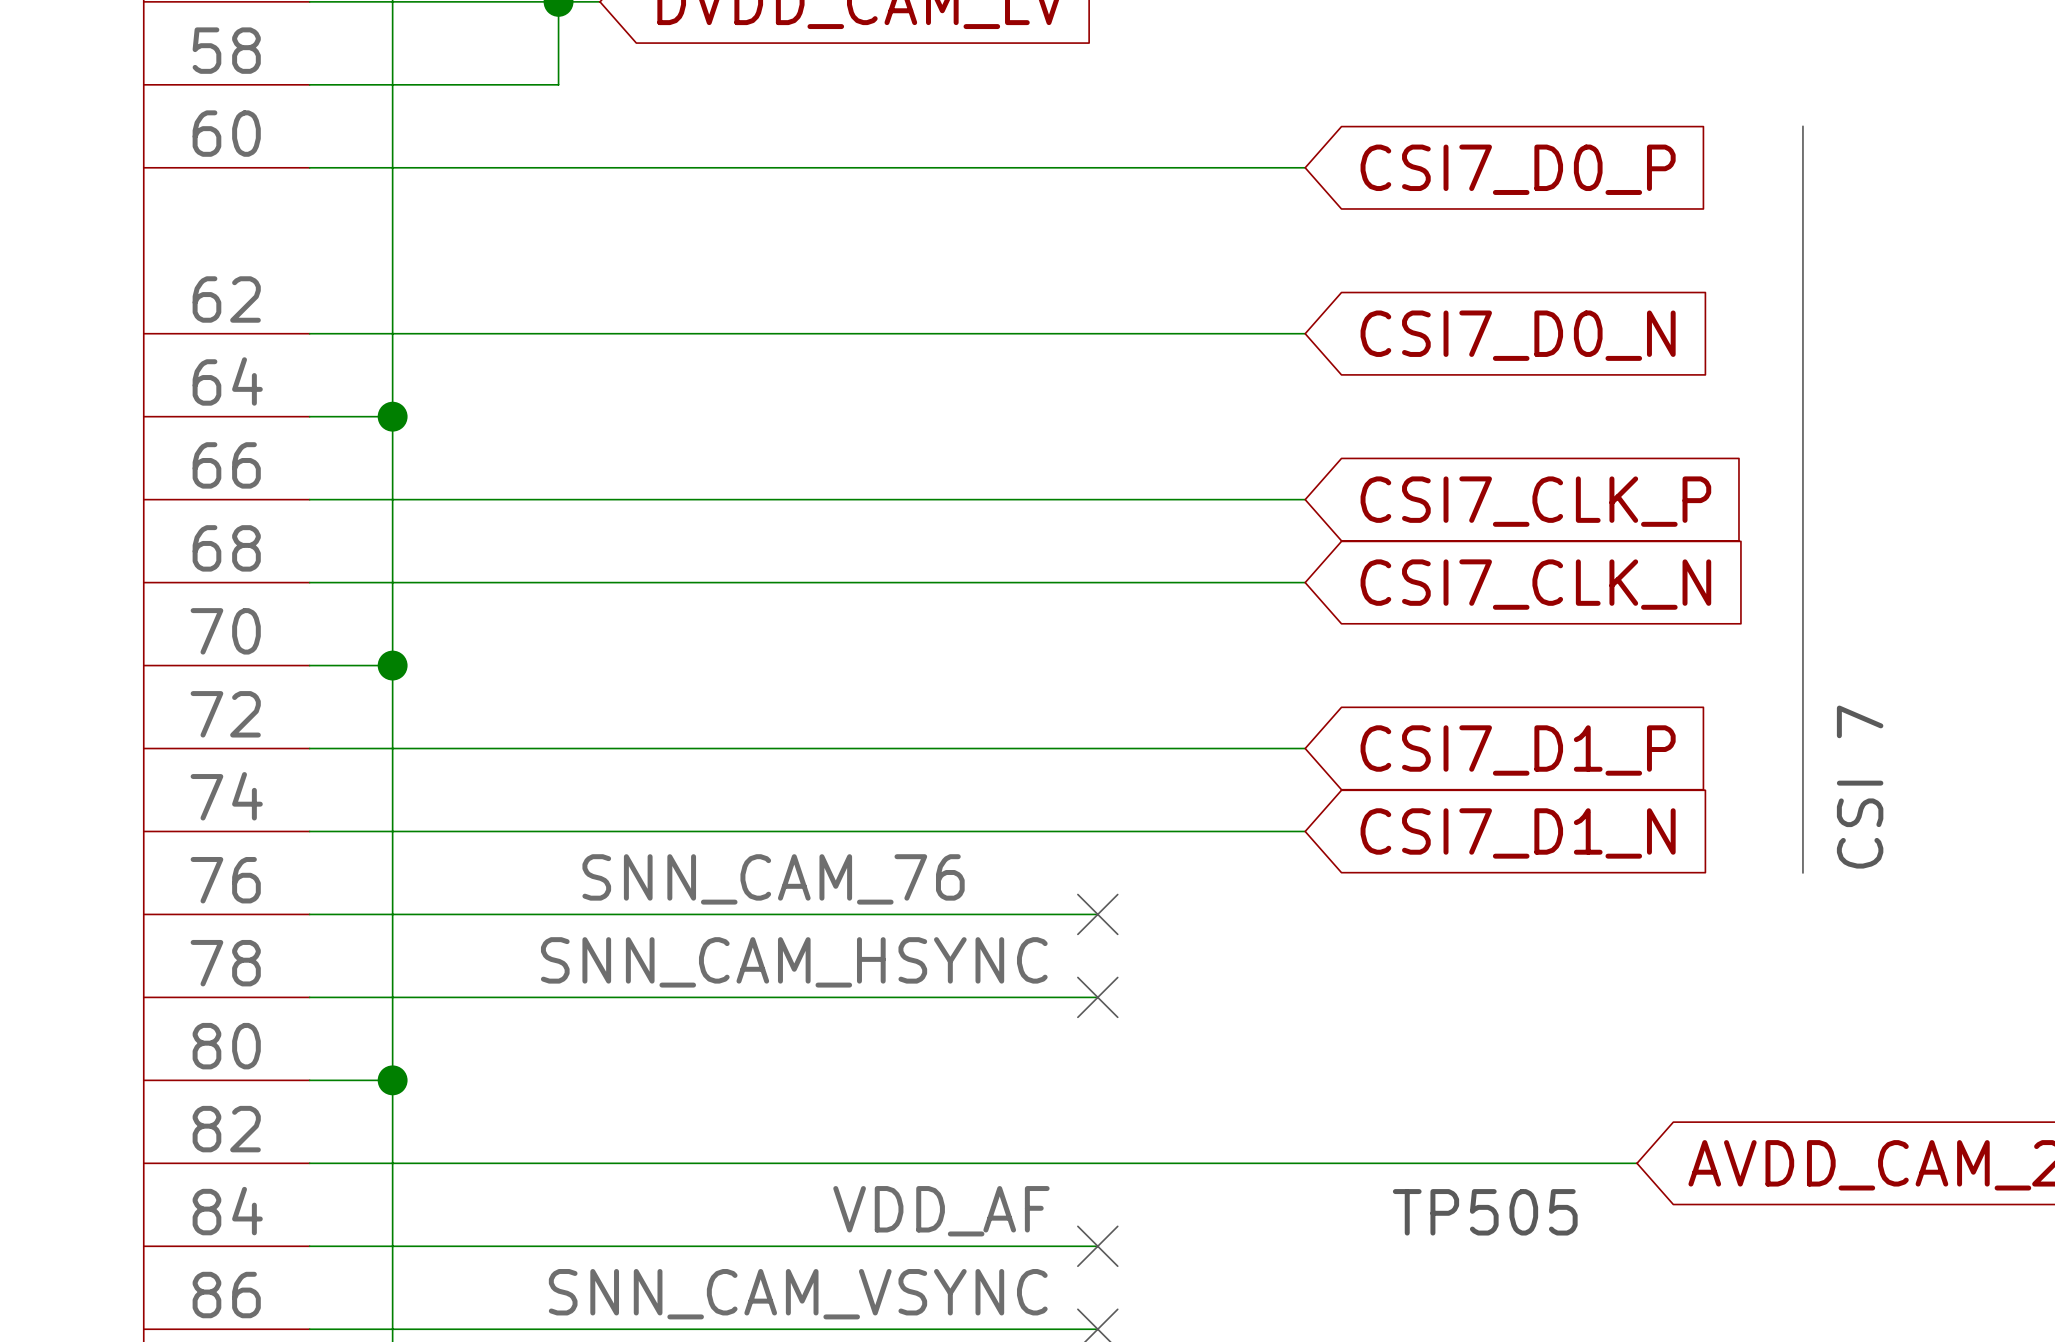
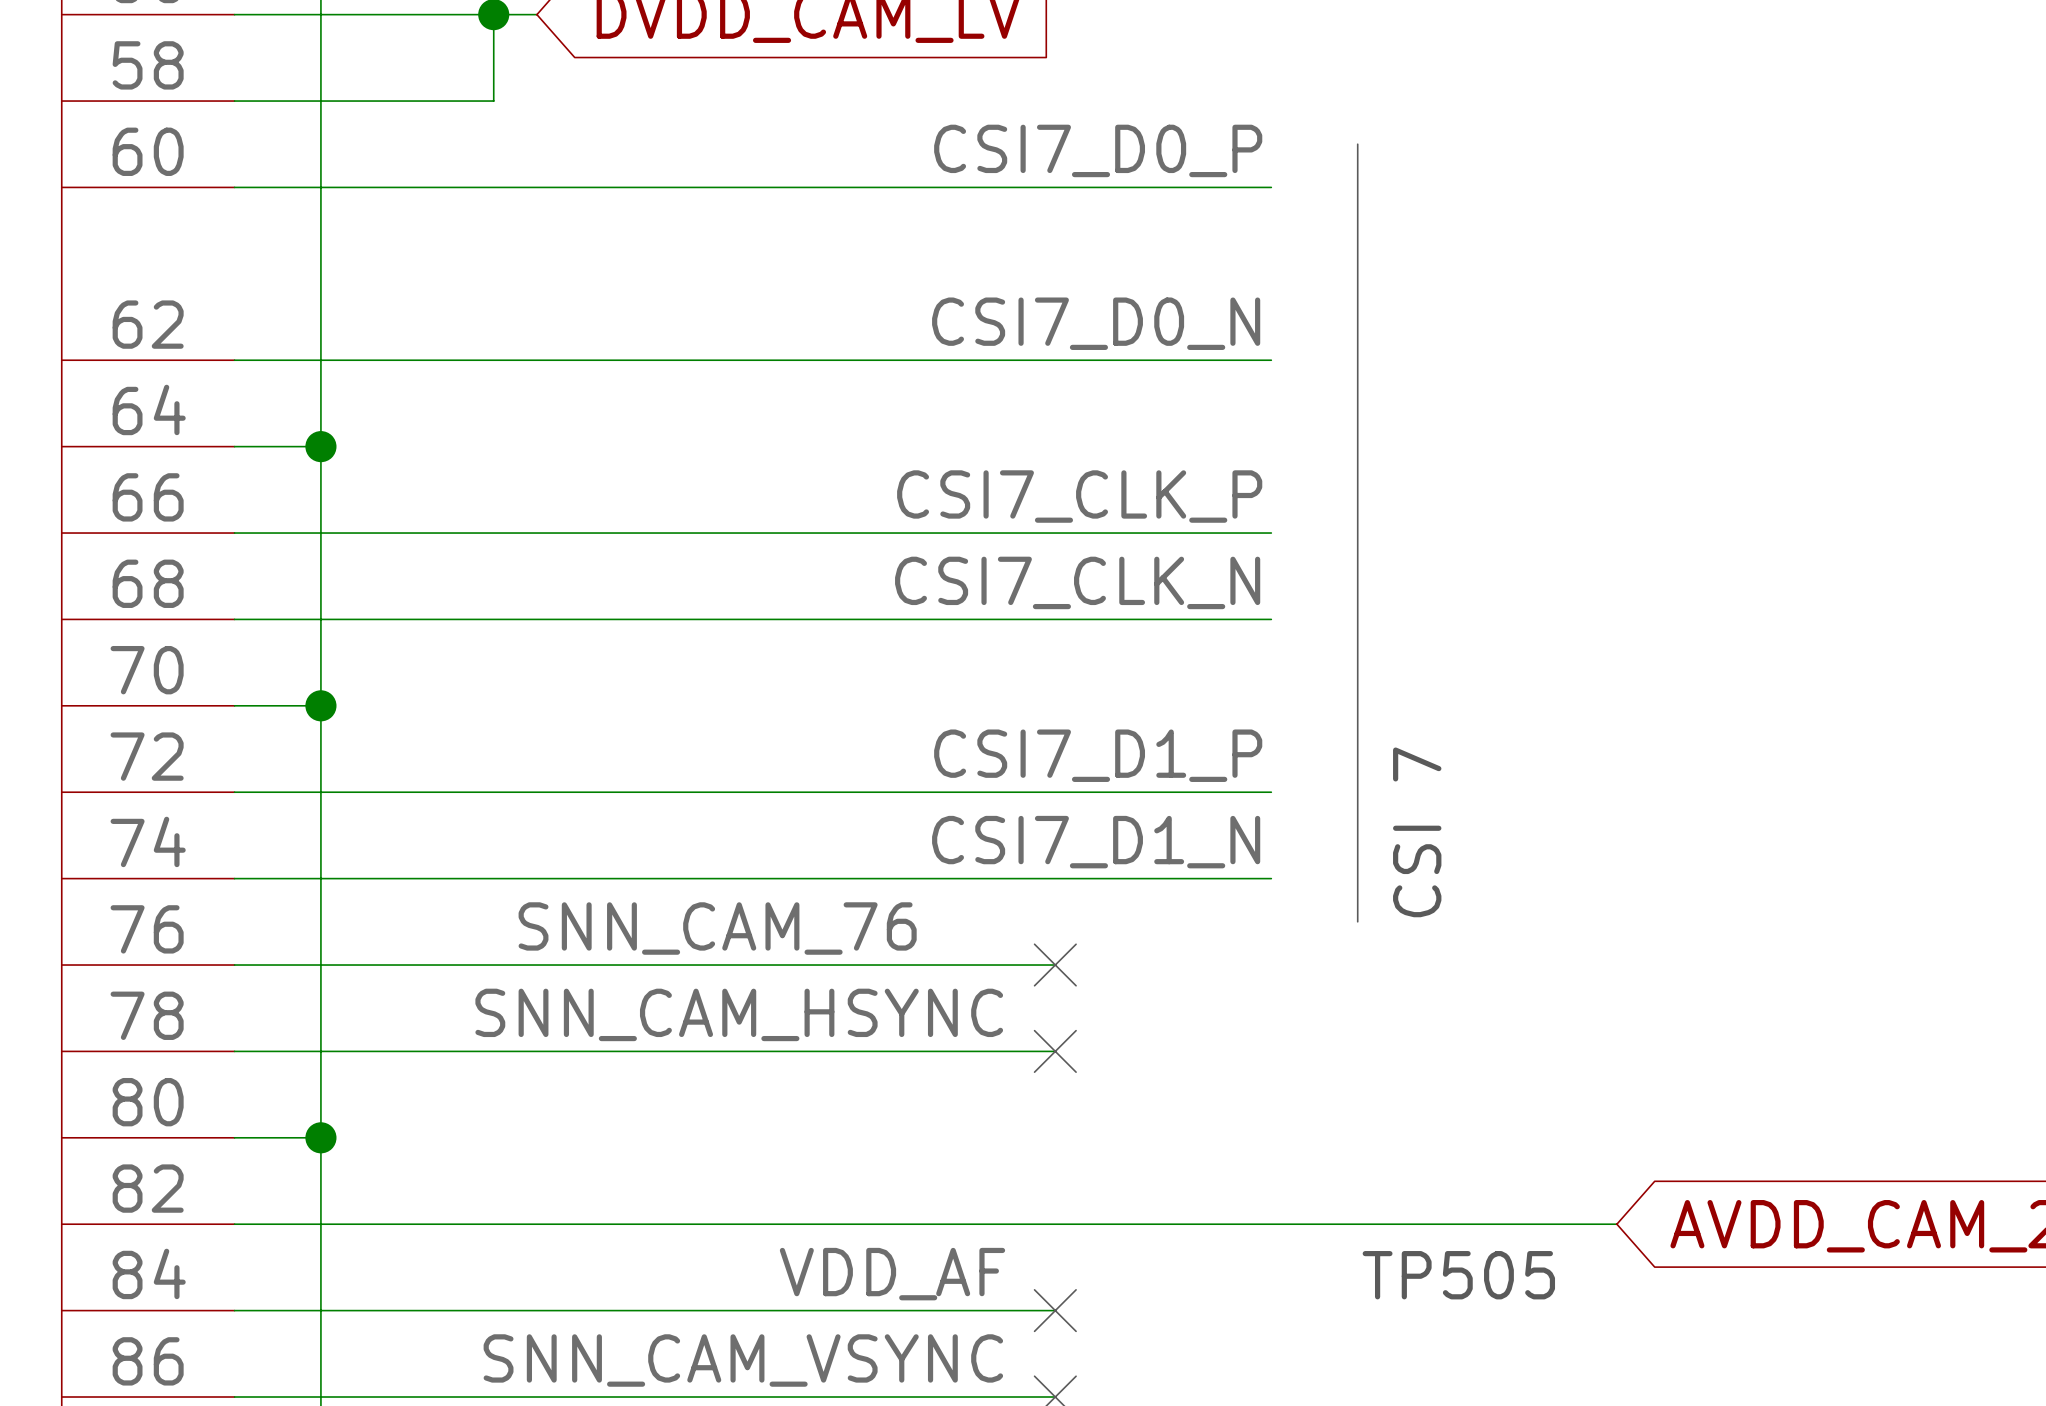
line: (1802, 126) (1802, 872) -> (1357, 144) (1357, 921)
label: none -> CSI7_D0_P (1098, 150)
global label: CSI7_D0_P (1518, 169) -> none
label: none -> CSI7_D0_N (1096, 323)
global label: CSI7_D0_N (1518, 335) -> none
label: none -> CSI7_CLK_P (1079, 496)
global label: CSI7_CLK_P (1535, 501) -> none
label: none -> CSI7_CLK_N (1077, 582)
global label: CSI7_CLK_N (1535, 584) -> none
label: none -> CSI7_D1_P (1098, 755)
global label: CSI7_D1_P (1518, 750) -> none
text position: CSI 7 (1860, 787) -> CSI 7 (1417, 832)
label: none -> CSI7_D1_N (1096, 842)
global label: CSI7_D1_N (1518, 833) -> none

